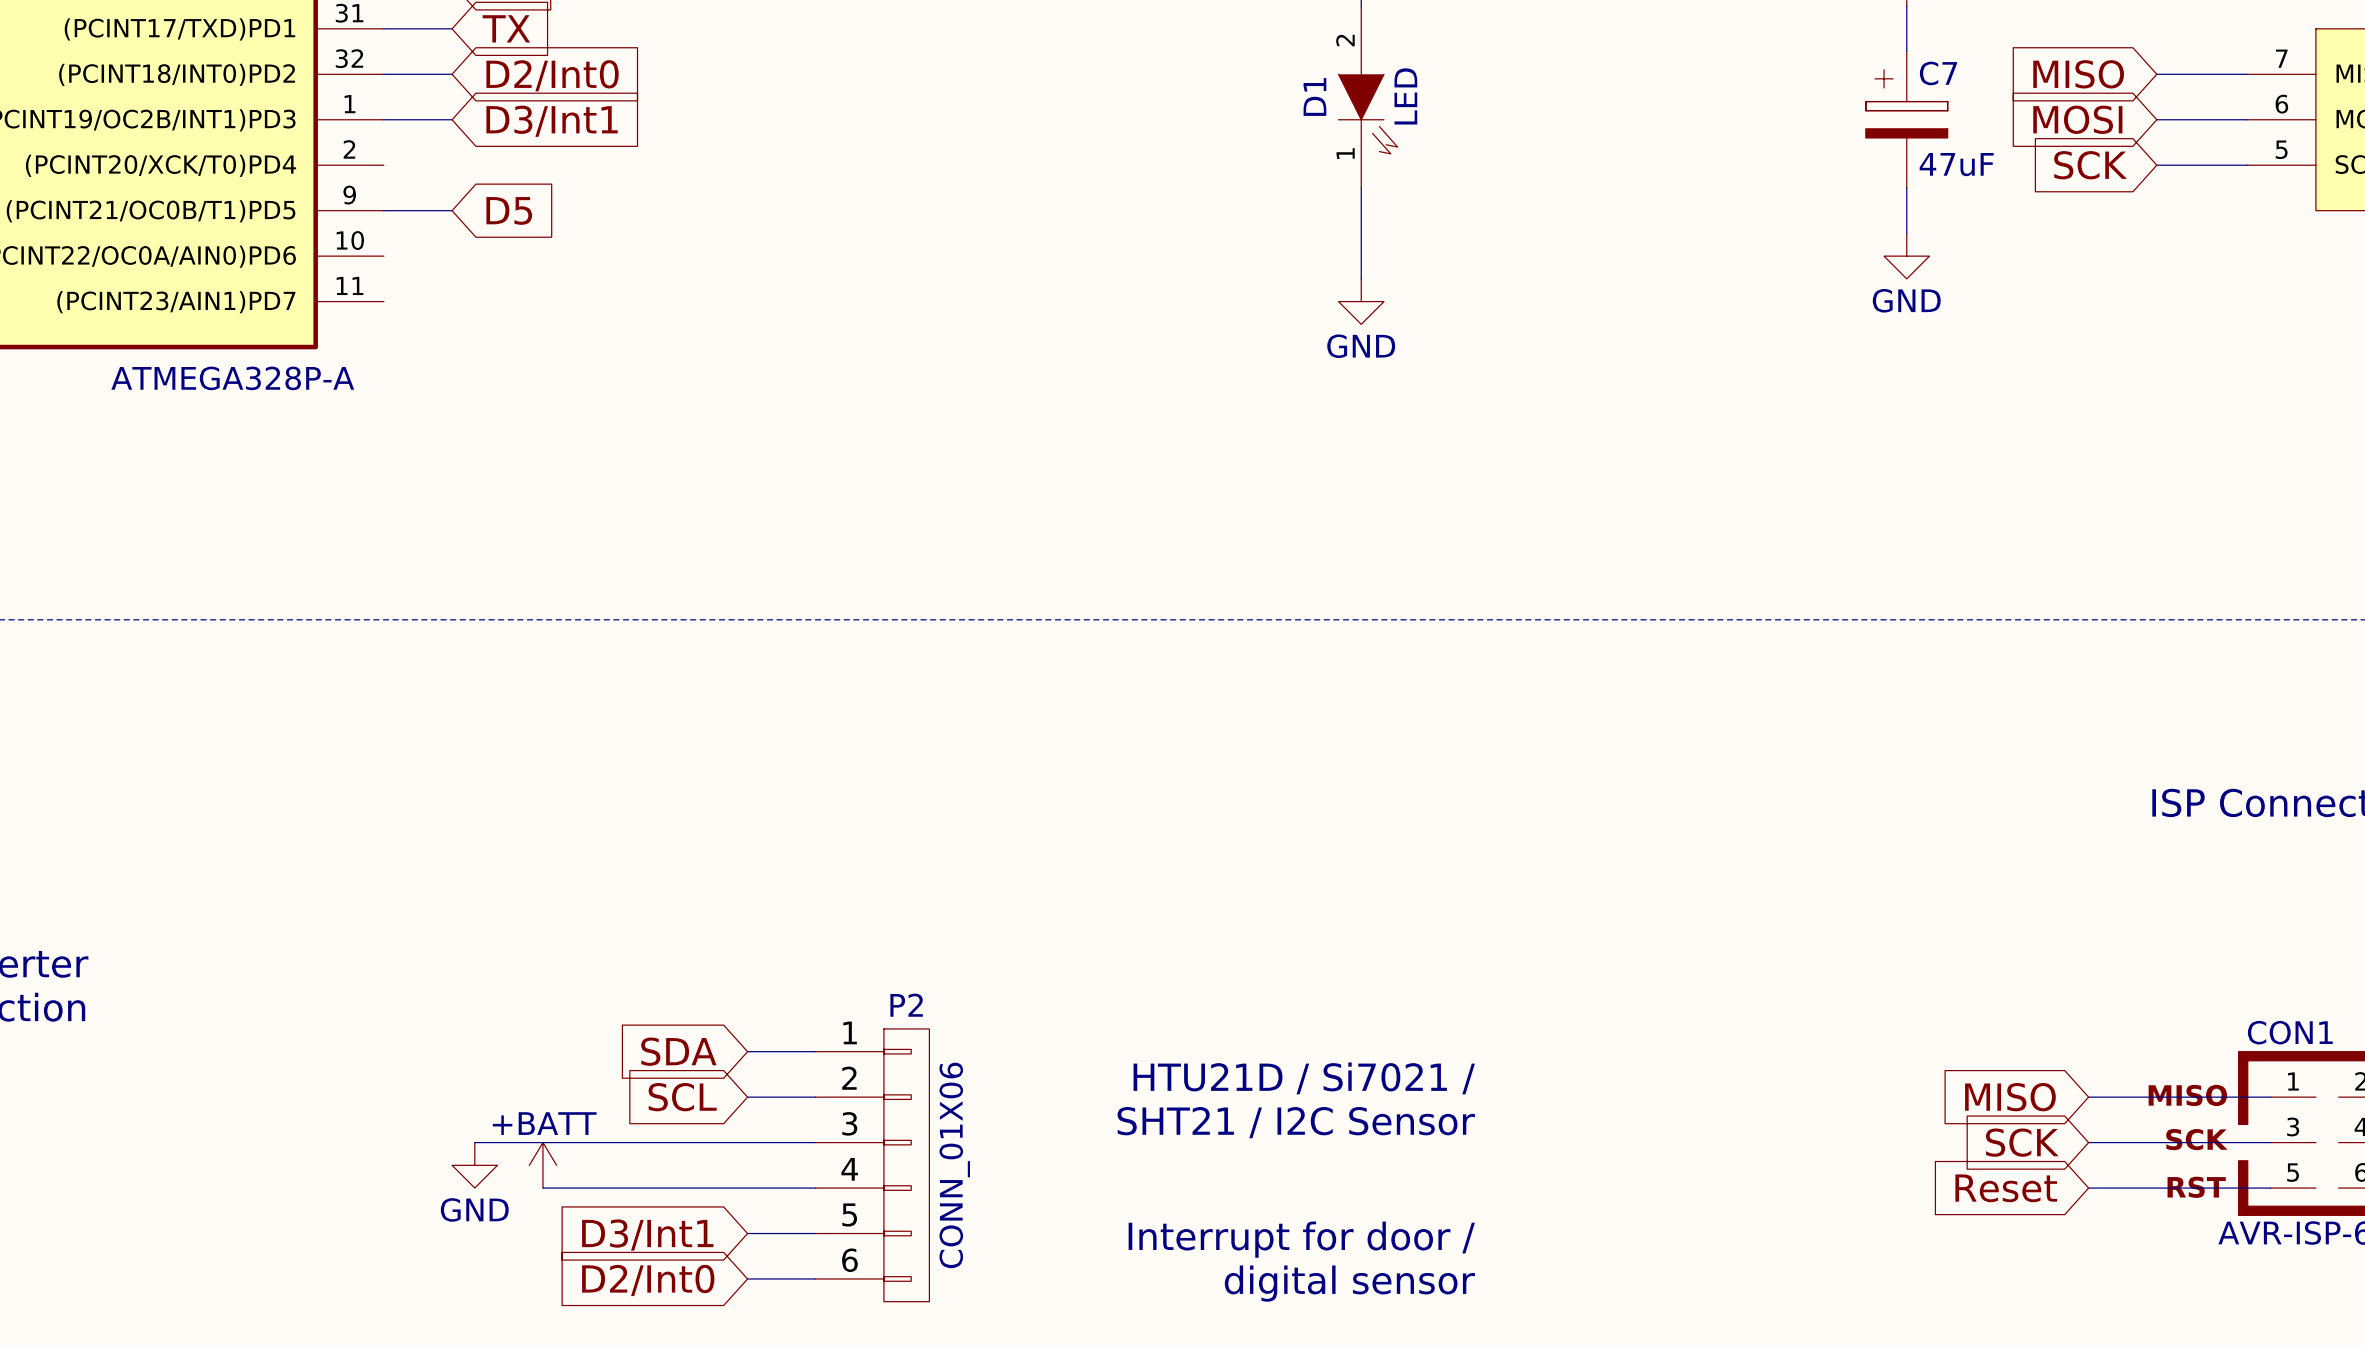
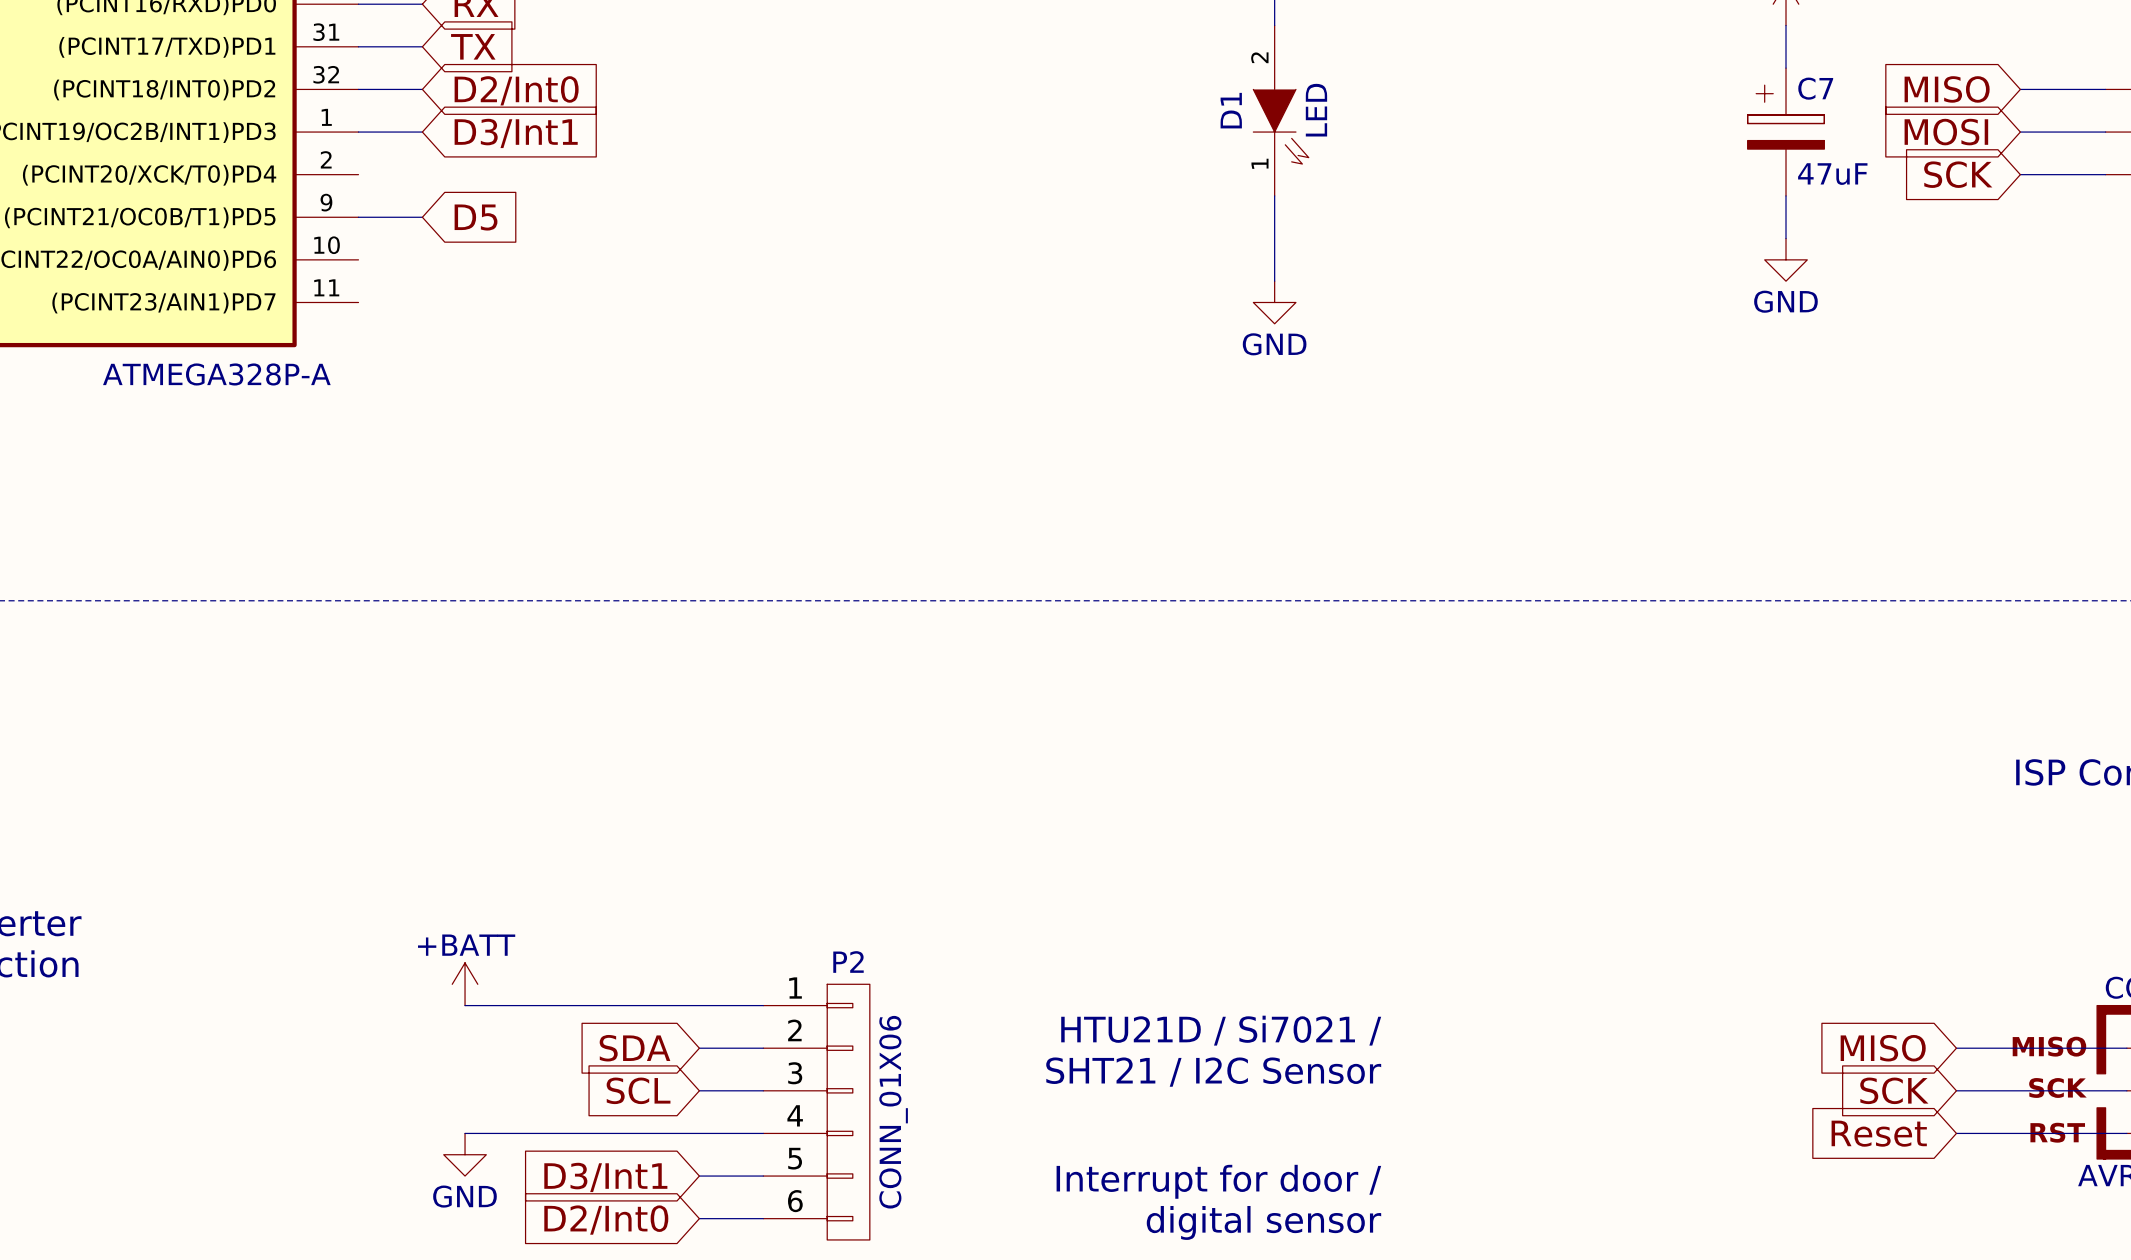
wire: none -> (465, 1005) (699, 1005)
global label: SDA (678, 1051) -> none
global label: SCL (682, 1097) -> SDA (635, 1048)
wire: (474, 1142) (747, 1142) -> none
global label: none -> SCL (638, 1090)
power symbol position: GND (474, 1165) -> GND (465, 1154)
power symbol position: +BATT (542, 1165) -> +BATT (465, 984)
wire: none -> (465, 1133) (507, 1133)

